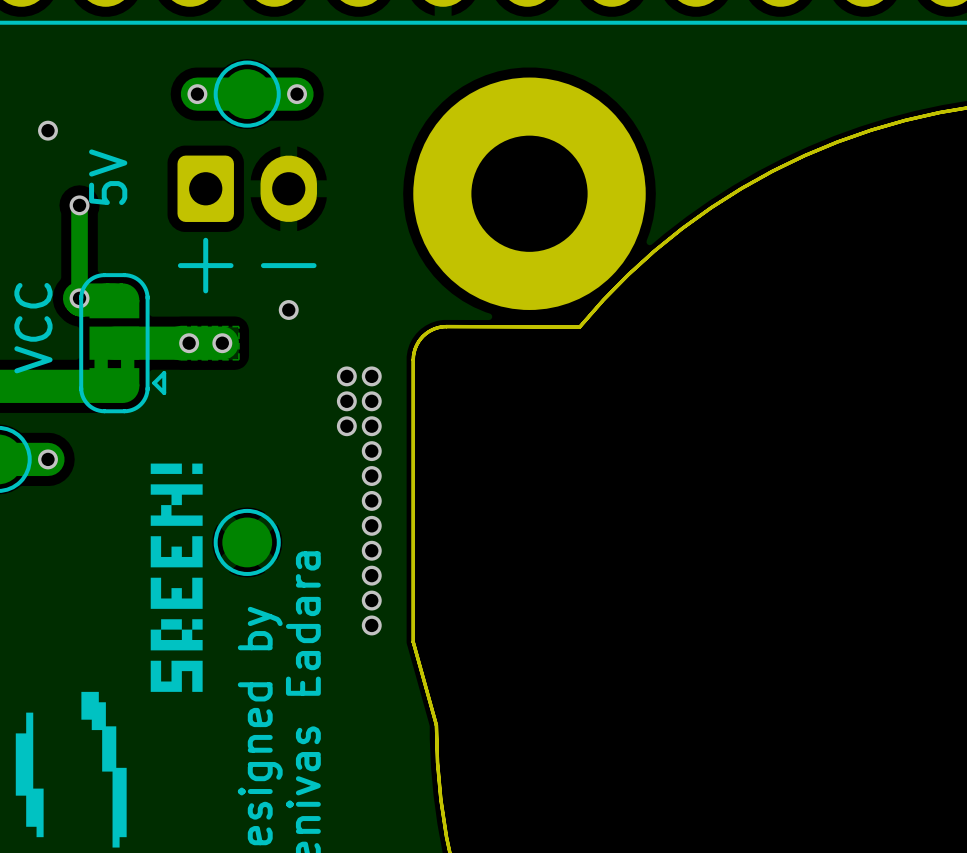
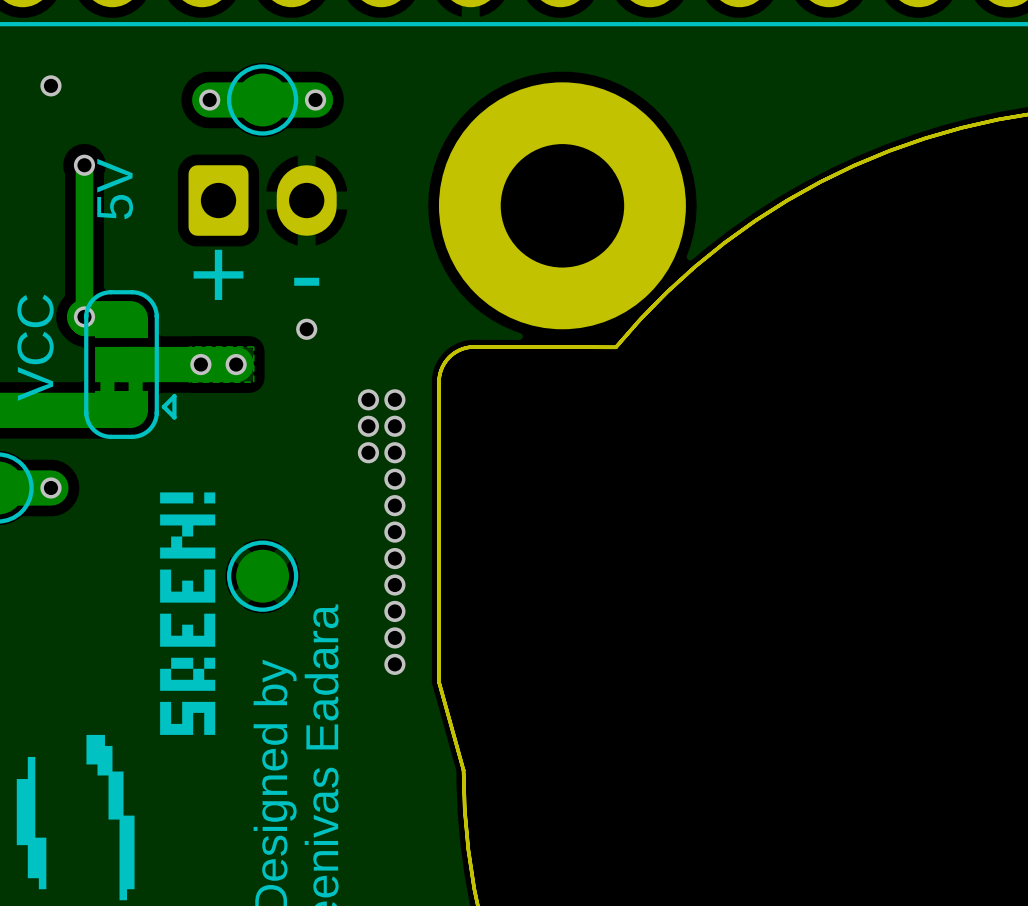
via: none -> (50, 85)
via: (47, 130) -> none
track: none -> (84, 165) (84, 218)
via: none -> (84, 165)
via: (79, 205) -> none

